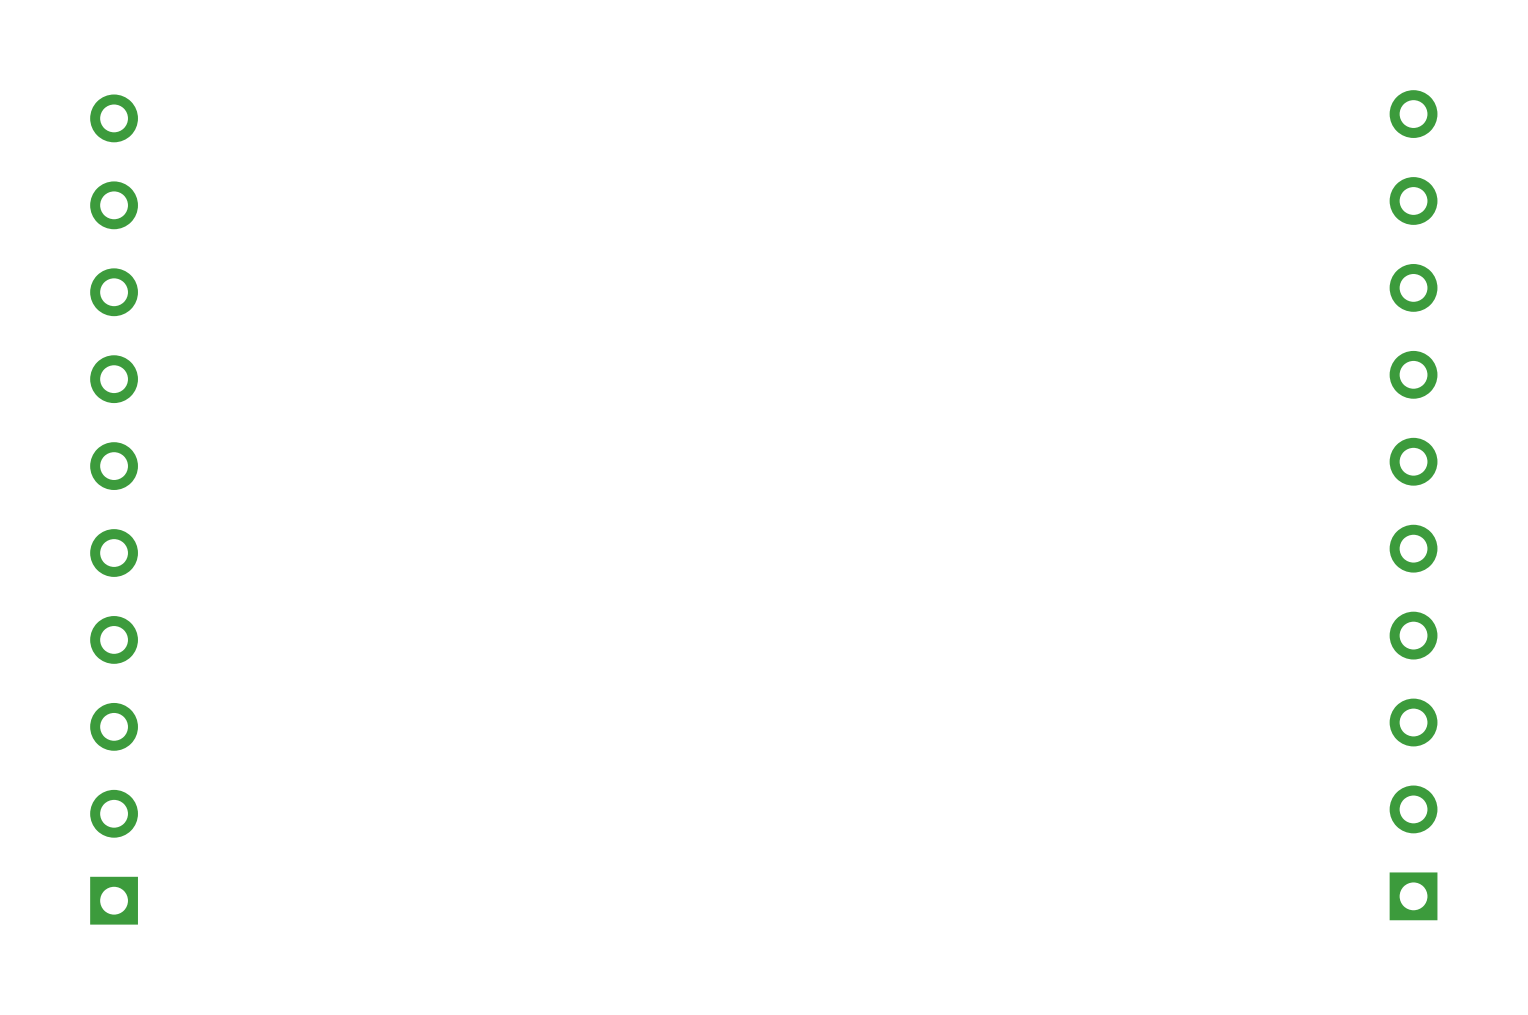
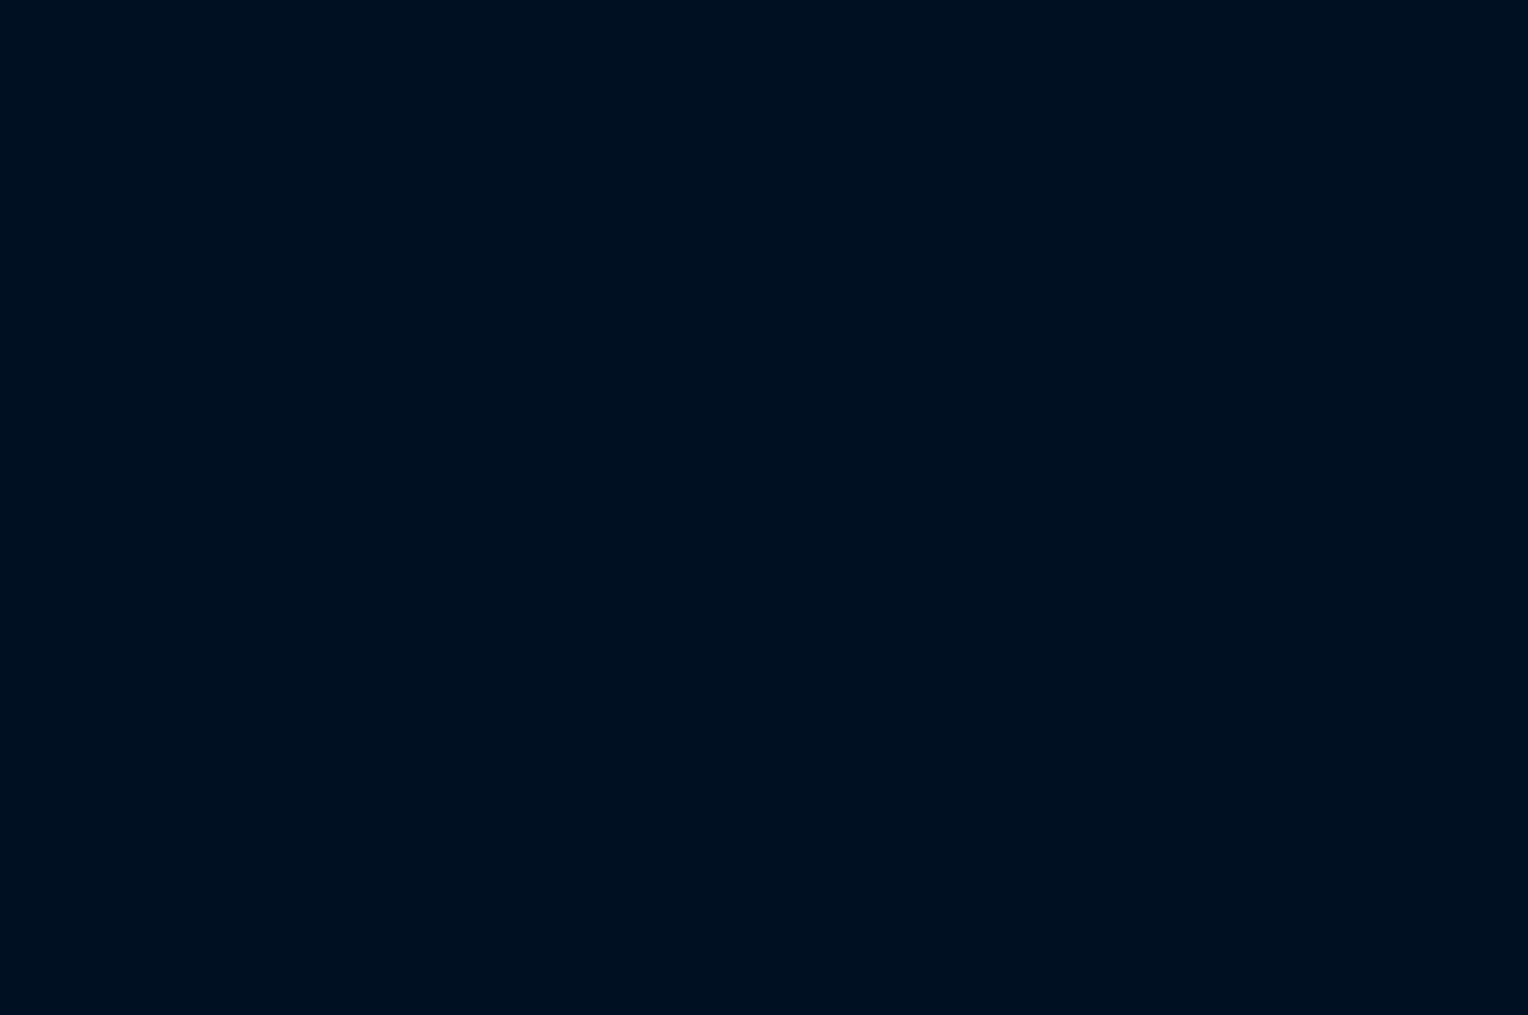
part: (1413, 505) -> none
part: (114, 509) -> none

